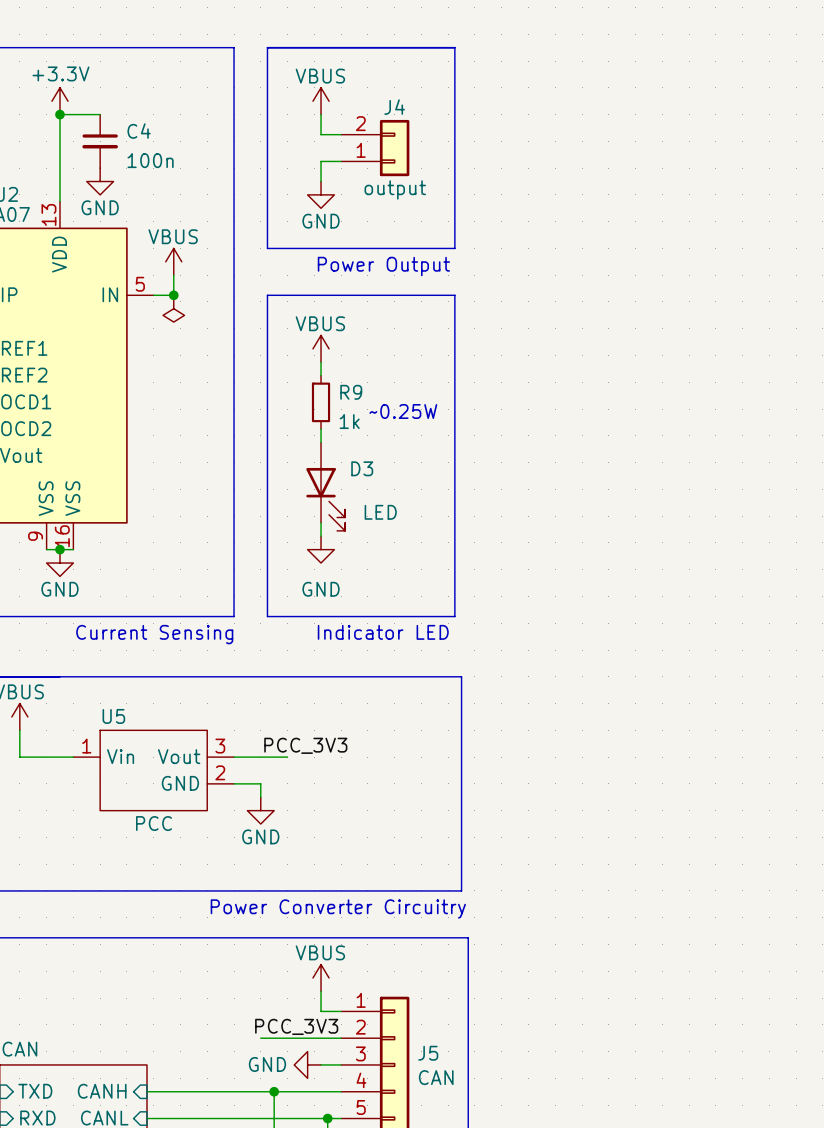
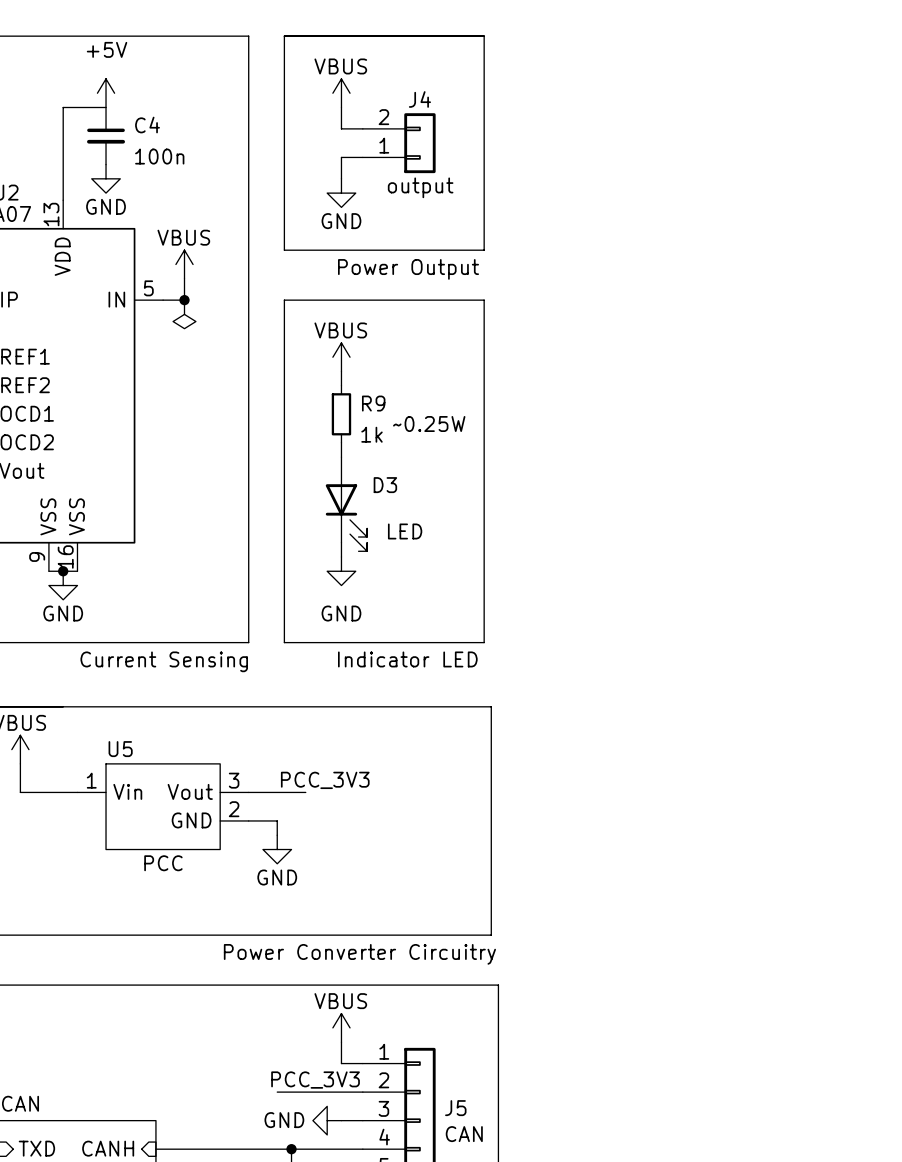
power symbol: +3.3V (59, 101) -> none
power symbol: none -> +5V (106, 93)
junction: (59, 114) -> none

